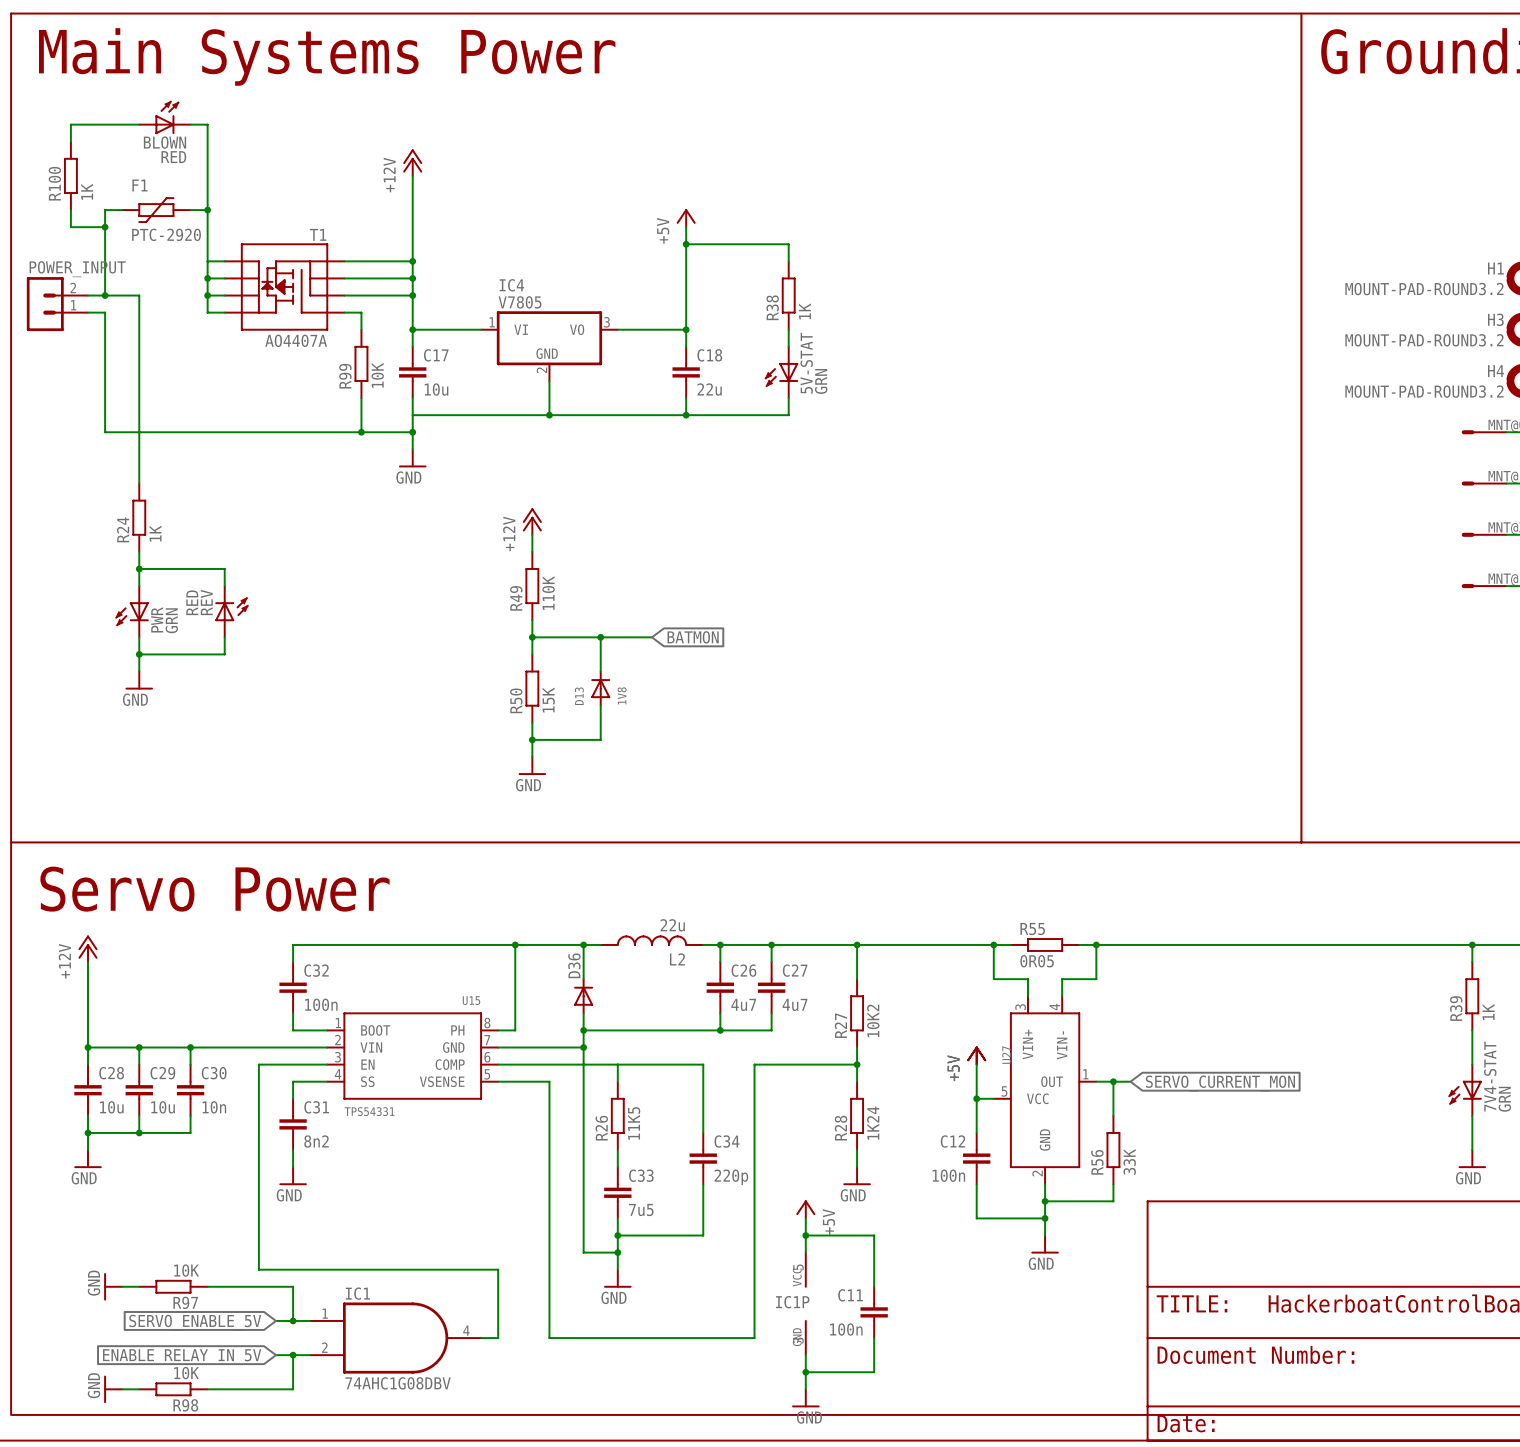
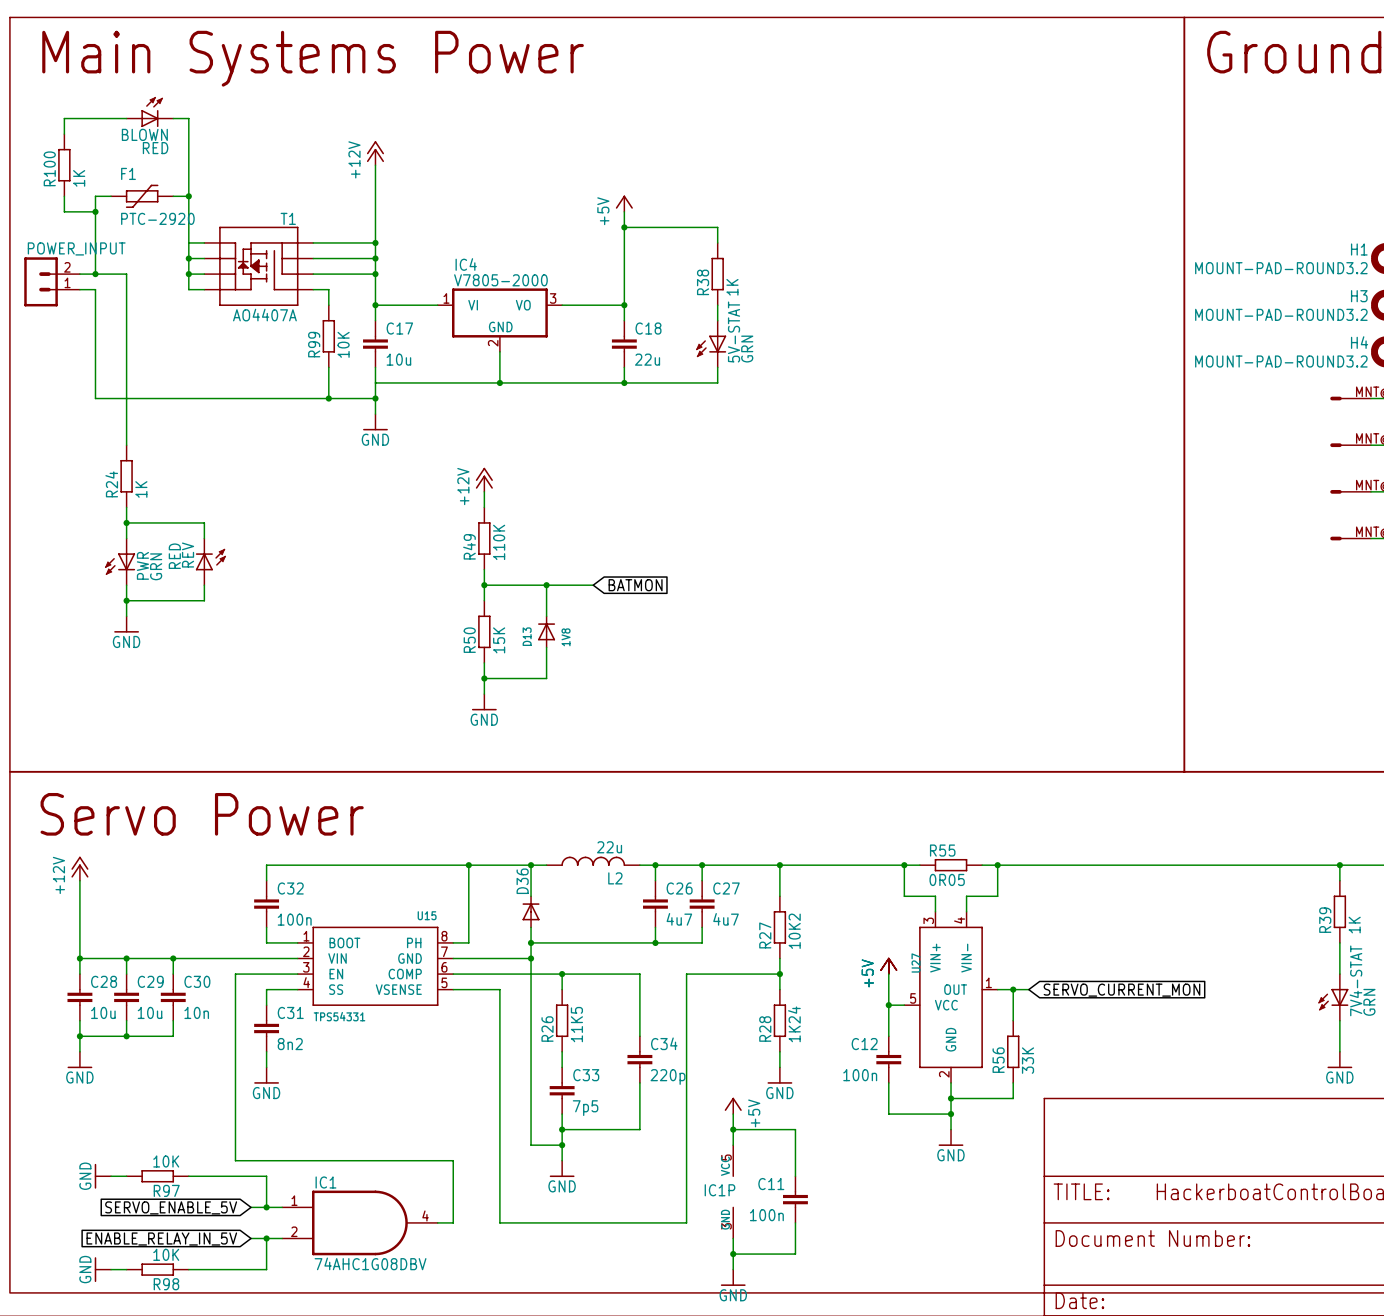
IC4 value: V7805 (520, 302) -> V7805-2000 (500, 280)
junction: none -> (562, 974)
C33 value: 7u5 (641, 1209) -> 7p5 (585, 1108)

